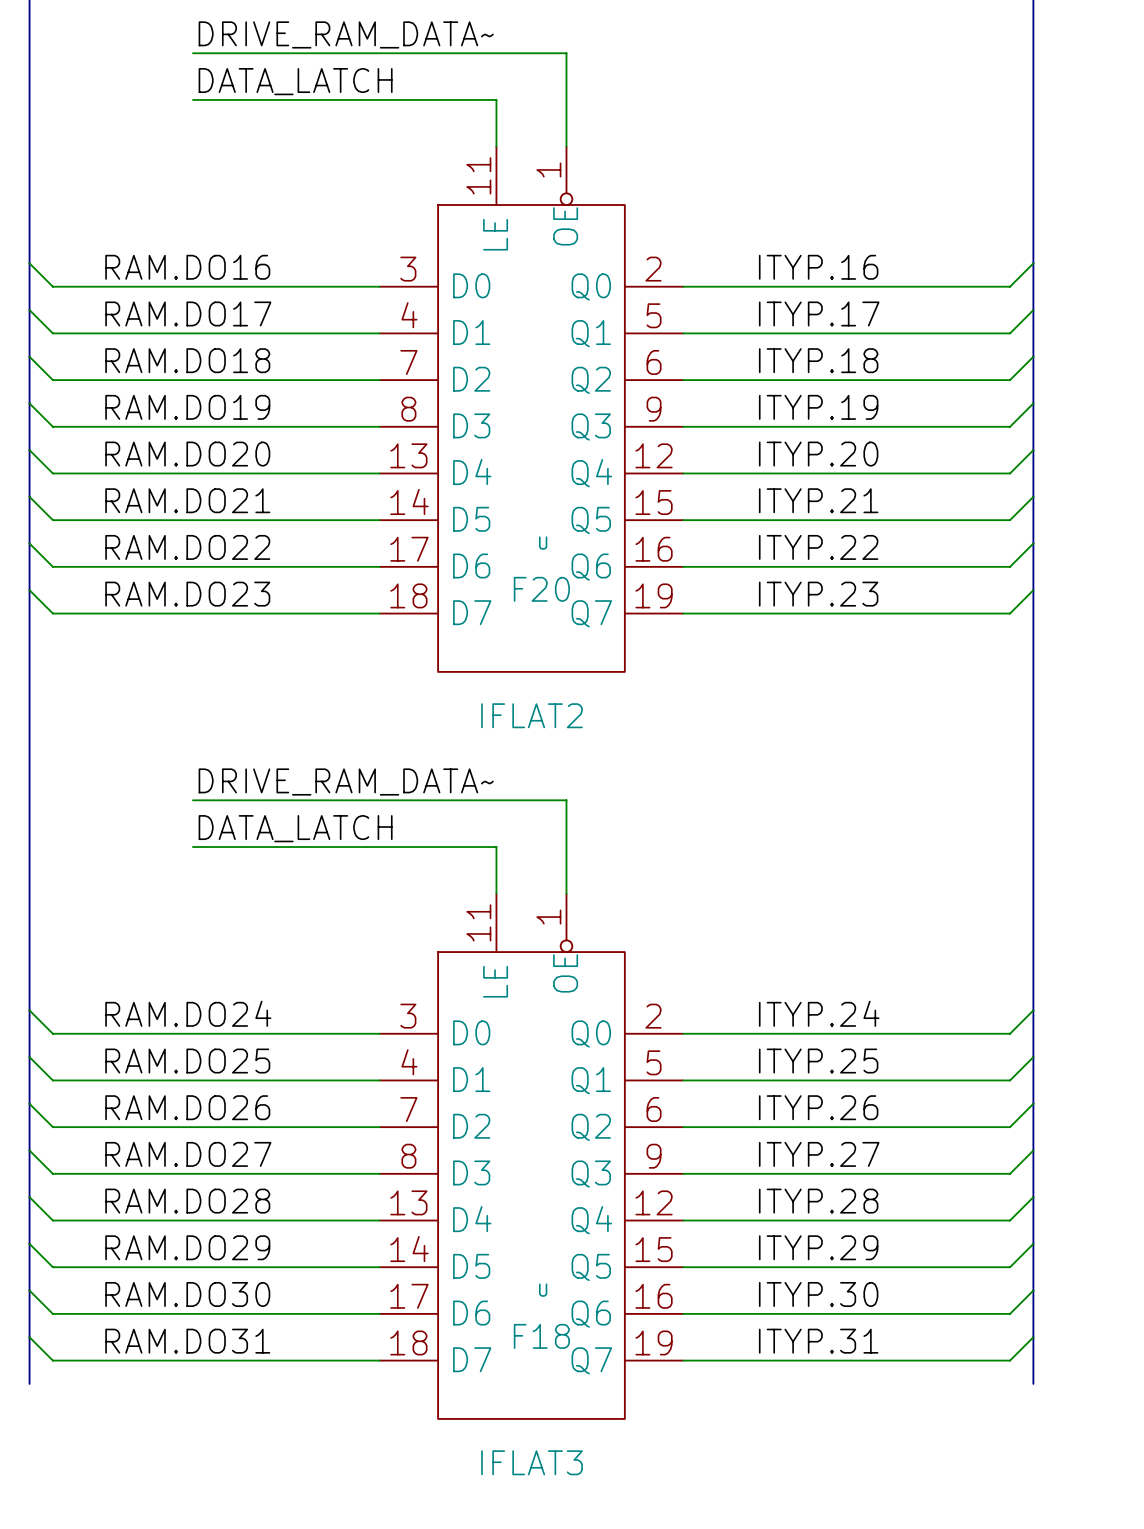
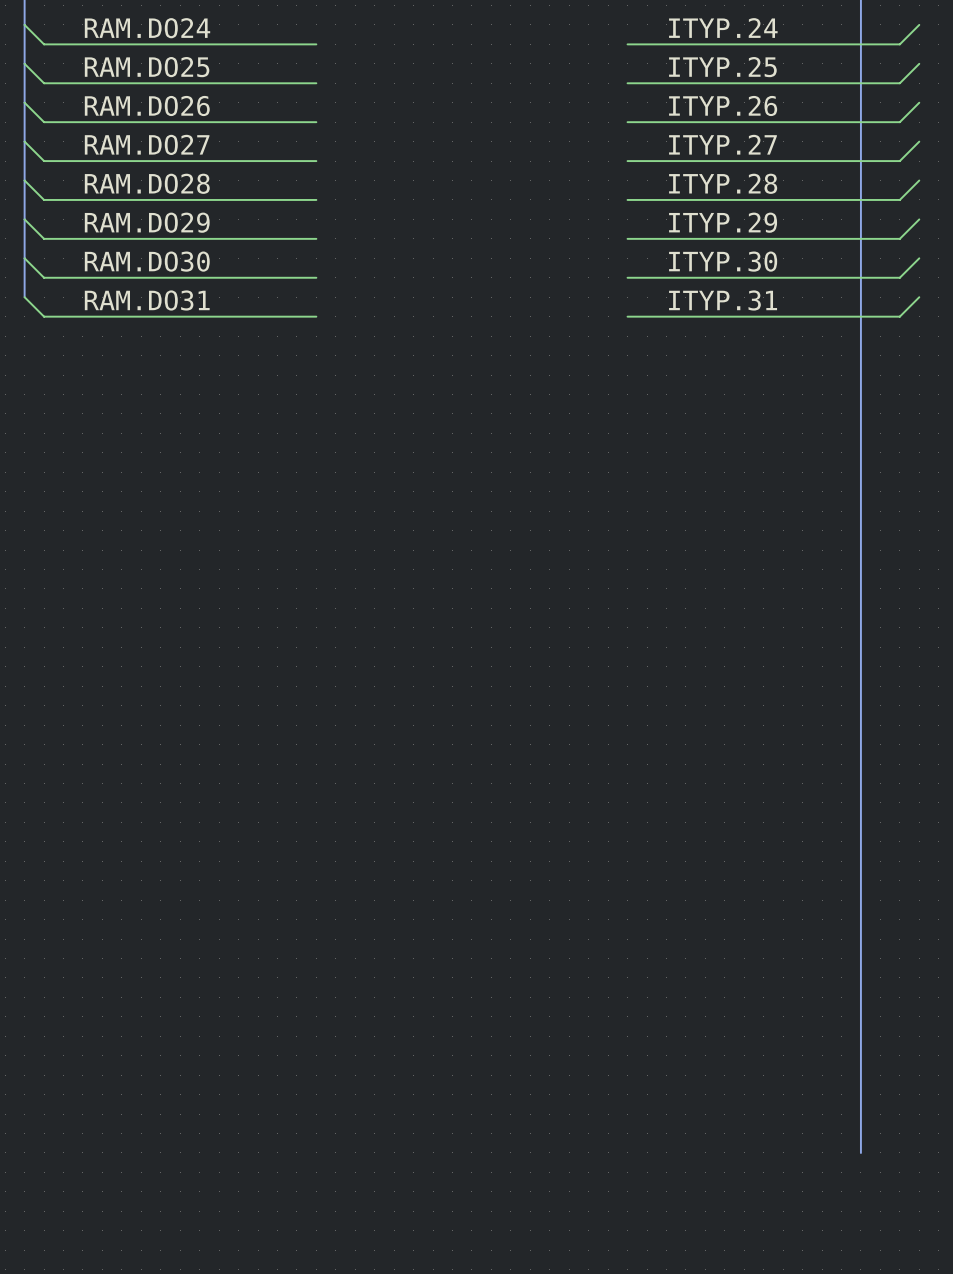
wire: none -> (24, 24) (44, 44) (160, 44)
wire: none -> (919, 24) (899, 44) (627, 44)
label: none -> RAM.DO24 (147, 28)
label: none -> ITYP.24 (723, 28)
label: DRIVE_RAM_DATA~ (346, 34) -> none
wire: (379, 53) (566, 53) (566, 146) -> none
wire: none -> (24, 63) (44, 83) (160, 83)
wire: none -> (919, 63) (899, 83) (627, 83)
label: none -> RAM.DO25 (147, 67)
label: none -> ITYP.25 (722, 67)
label: DATA_LATCH (295, 81) -> none
wire: (379, 99) (496, 99) (496, 146) -> none
wire: none -> (24, 102) (44, 122) (316, 122)
wire: none -> (919, 102) (899, 122) (627, 122)
label: none -> RAM.DO26 (147, 105)
label: none -> ITYP.26 (723, 105)
wire: none -> (24, 141) (44, 161) (316, 161)
wire: none -> (919, 141) (899, 161) (627, 161)
label: none -> RAM.DO27 (147, 144)
label: none -> ITYP.27 (722, 144)
label: none -> RAM.DO28 (147, 183)
label: none -> ITYP.28 (723, 183)
wire: (1033, 263) (1010, 286) -> (919, 219) (899, 238) (841, 238)
label: RAM.DO16 (187, 267) -> RAM.DO29 (147, 222)
label: ITYP.16 (818, 267) -> none
label: none -> ITYP.29 (723, 222)
wire: (683, 286) (753, 286) -> none
wire: (1033, 310) (1010, 333) -> (919, 258) (899, 277) (841, 277)
label: RAM.DO17 (188, 313) -> RAM.DO30 (147, 261)
label: ITYP.17 (819, 313) -> none
label: none -> ITYP.30 (723, 261)
wire: (683, 333) (753, 333) -> none
bus: (29, 356) (29, 1383) -> none
wire: (1033, 356) (1010, 380) -> (919, 297) (899, 316) (841, 316)
label: RAM.DO18 (187, 360) -> RAM.DO31 (147, 300)
label: ITYP.18 (818, 360) -> none
label: none -> ITYP.31 (723, 300)
wire: (683, 380) (753, 380) -> none
wire: (29, 403) (52, 426) (379, 426) -> (24, 180) (44, 199) (316, 199)
wire: (1033, 403) (1010, 426) (683, 426) -> (919, 180) (899, 199) (627, 199)
label: RAM.DO19 (187, 407) -> none
label: ITYP.19 (818, 407) -> none
U: (531, 409) -> none
wire: (29, 450) (52, 473) (379, 473) -> none
wire: (1033, 450) (1010, 473) (683, 473) -> none
label: RAM.DO20 (187, 454) -> none
label: ITYP.20 (818, 454) -> none
wire: (29, 496) (52, 520) (379, 520) -> none
wire: (1033, 496) (1010, 520) (683, 520) -> none
label: RAM.DO21 (187, 500) -> none
label: ITYP.21 (818, 500) -> none
wire: (29, 543) (52, 566) (379, 566) -> none
wire: (1033, 543) (1010, 566) (683, 566) -> none
label: RAM.DO22 (187, 547) -> none
label: ITYP.22 (818, 547) -> none
wire: (29, 590) (52, 613) (379, 613) -> none
wire: (1033, 590) (1010, 613) (683, 613) -> none
label: RAM.DO23 (187, 594) -> none
label: ITYP.23 (818, 594) -> none
label: DRIVE_RAM_DATA~ (346, 781) -> none
wire: (192, 800) (566, 800) (566, 893) -> none
label: DATA_LATCH (295, 828) -> none
wire: (192, 847) (496, 847) (496, 893) -> none
wire: (29, 1010) (52, 1033) (379, 1033) -> none
wire: (1033, 1010) (1010, 1033) (683, 1033) -> none
label: RAM.DO24 (188, 1013) -> none
label: ITYP.24 (819, 1013) -> none
wire: (29, 1057) (52, 1080) (379, 1080) -> none
wire: (1033, 1057) (1010, 1080) (683, 1080) -> none
label: RAM.DO25 (187, 1061) -> none
label: ITYP.25 (818, 1061) -> none
wire: (29, 1103) (52, 1127) (379, 1127) -> none
wire: (1033, 1103) (1010, 1127) (683, 1127) -> none
label: RAM.DO26 (187, 1107) -> none
label: ITYP.26 (818, 1107) -> none
wire: (29, 1150) (52, 1173) (379, 1173) -> none
wire: (1033, 1150) (1010, 1173) (683, 1173) -> none
label: RAM.DO27 (188, 1154) -> none
label: ITYP.27 (819, 1154) -> none
U: (531, 1156) -> none
wire: (29, 1197) (52, 1220) (379, 1220) -> none
wire: (1033, 1197) (1010, 1220) (683, 1220) -> none
label: RAM.DO28 (187, 1201) -> none
label: ITYP.28 (818, 1201) -> none
wire: (29, 1243) (52, 1267) (379, 1267) -> none
wire: (1033, 1243) (1010, 1267) (683, 1267) -> none
label: RAM.DO29 (187, 1247) -> none
label: ITYP.29 (818, 1247) -> none
wire: (29, 1290) (52, 1313) (379, 1313) -> none
wire: (1033, 1290) (1010, 1313) (683, 1313) -> none
label: RAM.DO30 (187, 1294) -> none
label: ITYP.30 (818, 1294) -> none
wire: (29, 1337) (52, 1360) (379, 1360) -> none
wire: (1033, 1337) (1010, 1360) (683, 1360) -> none
label: RAM.DO31 (187, 1341) -> none
label: ITYP.31 (818, 1341) -> none

